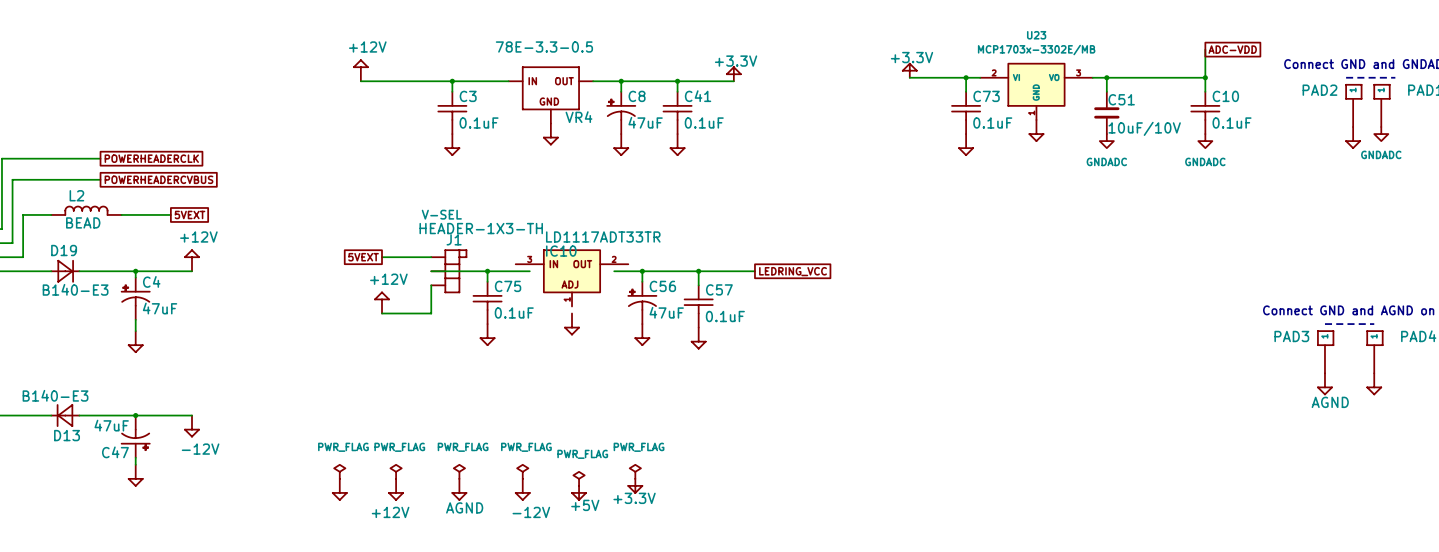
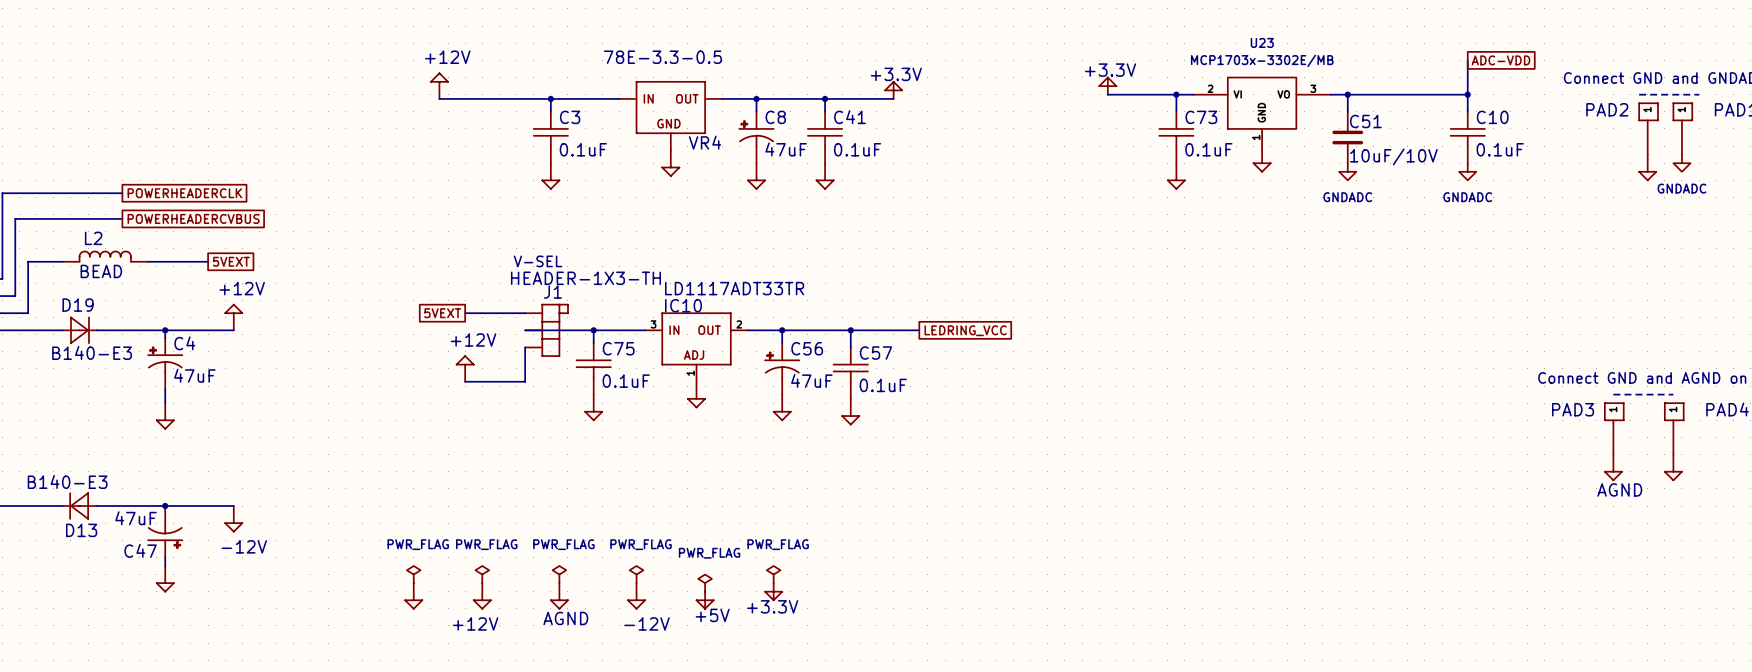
U23 symbol: [980, 63, 1093, 120] -> [1193, 77, 1331, 147]
IC10 symbol: [515, 250, 629, 307] -> [645, 313, 748, 382]

